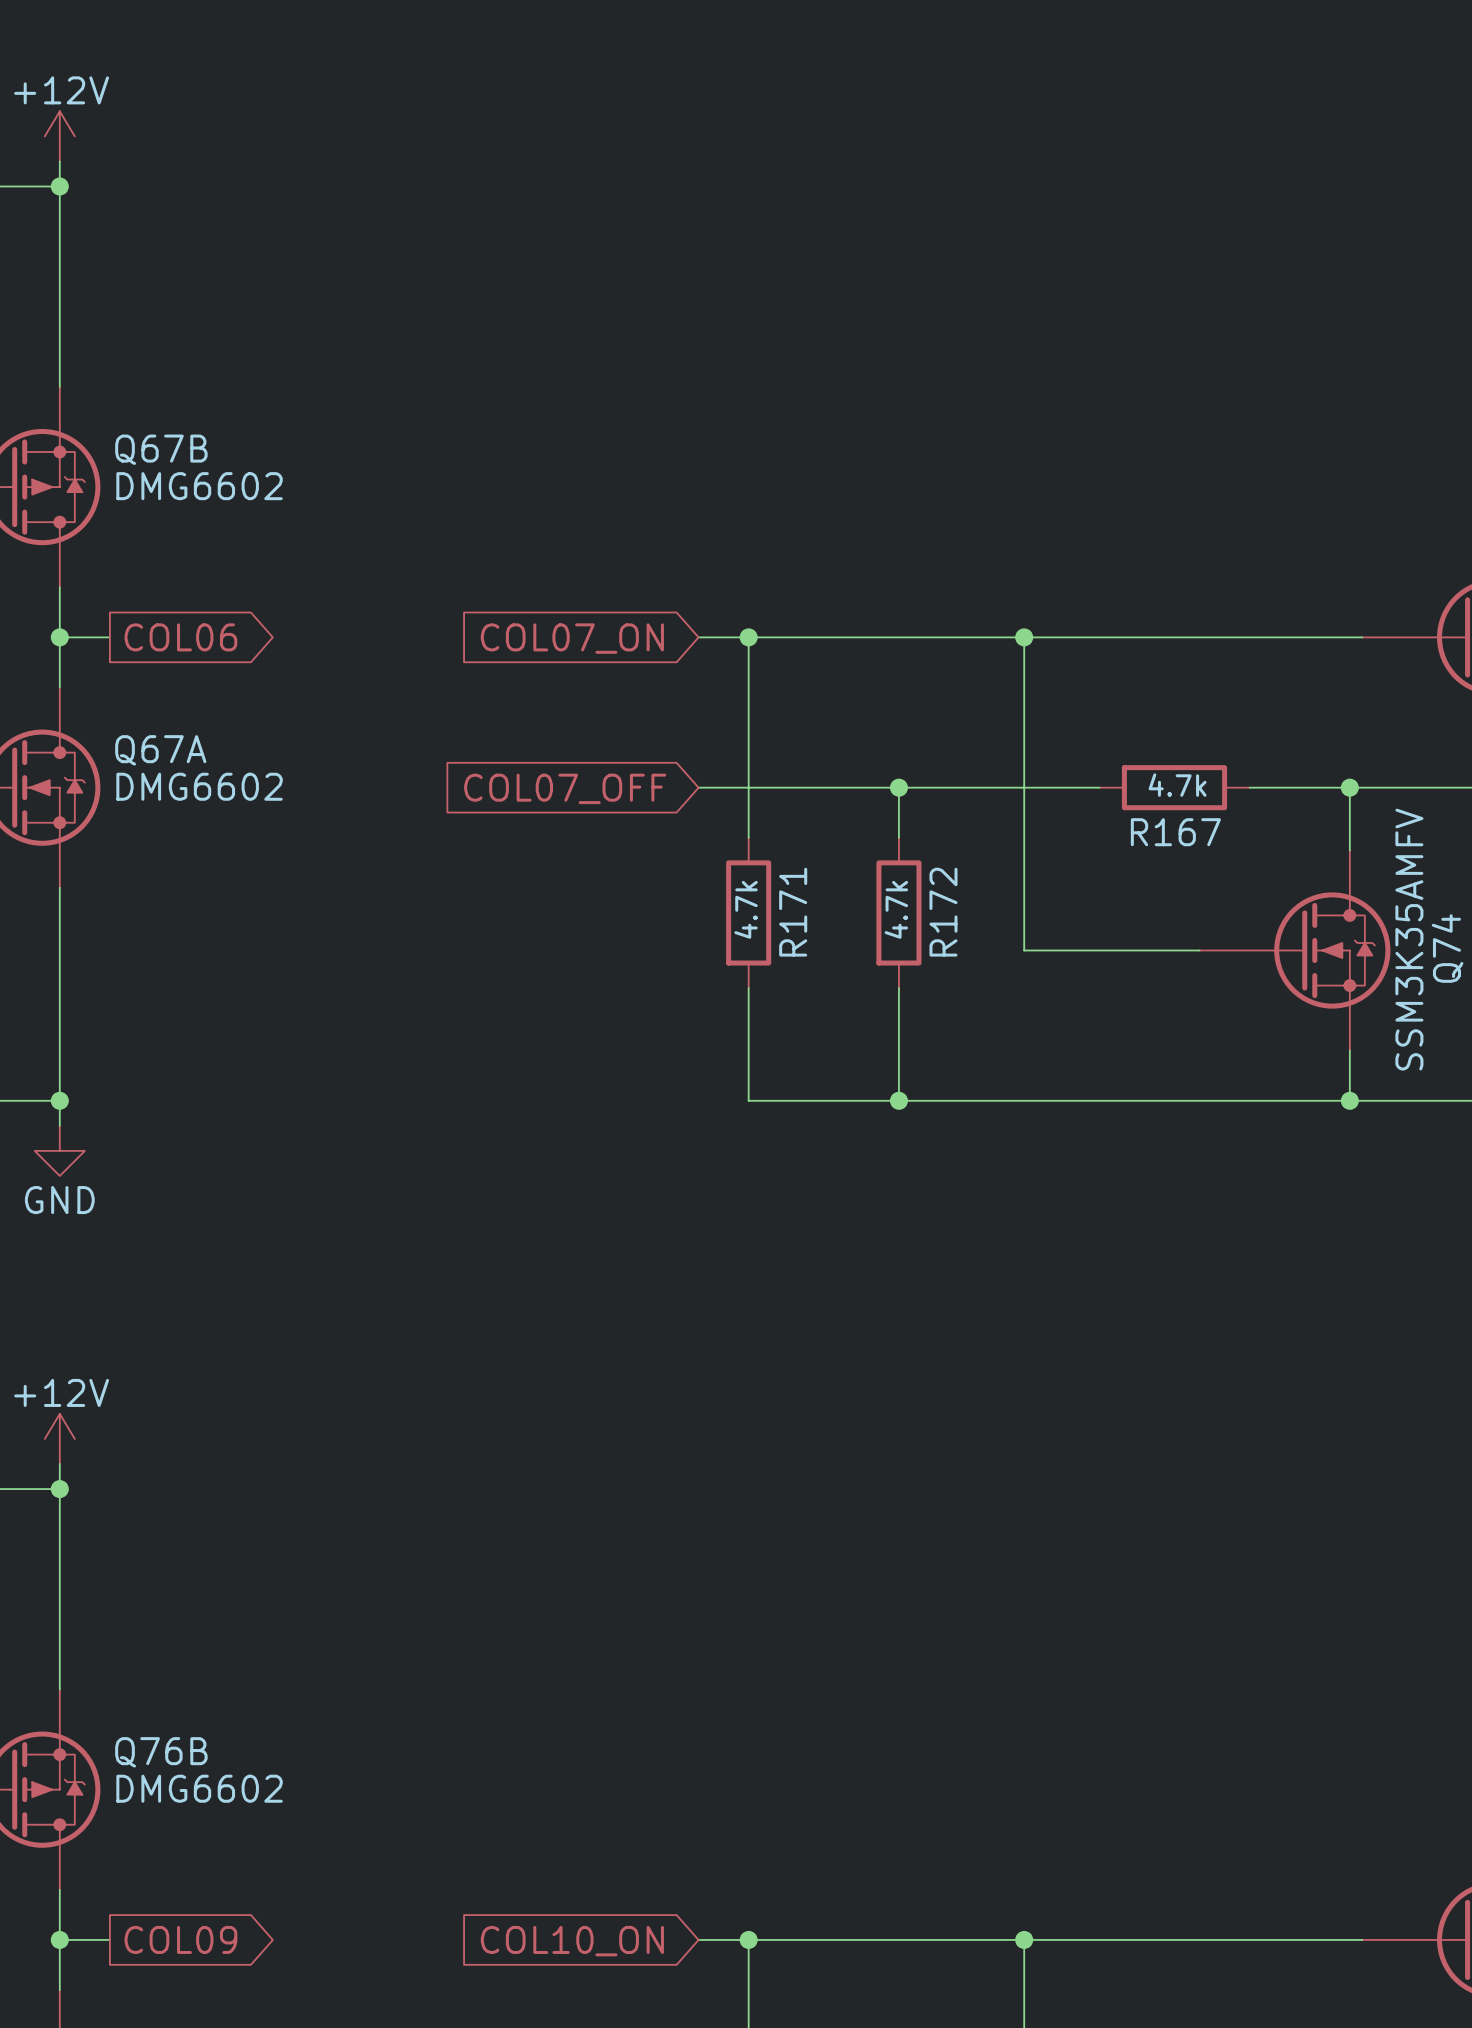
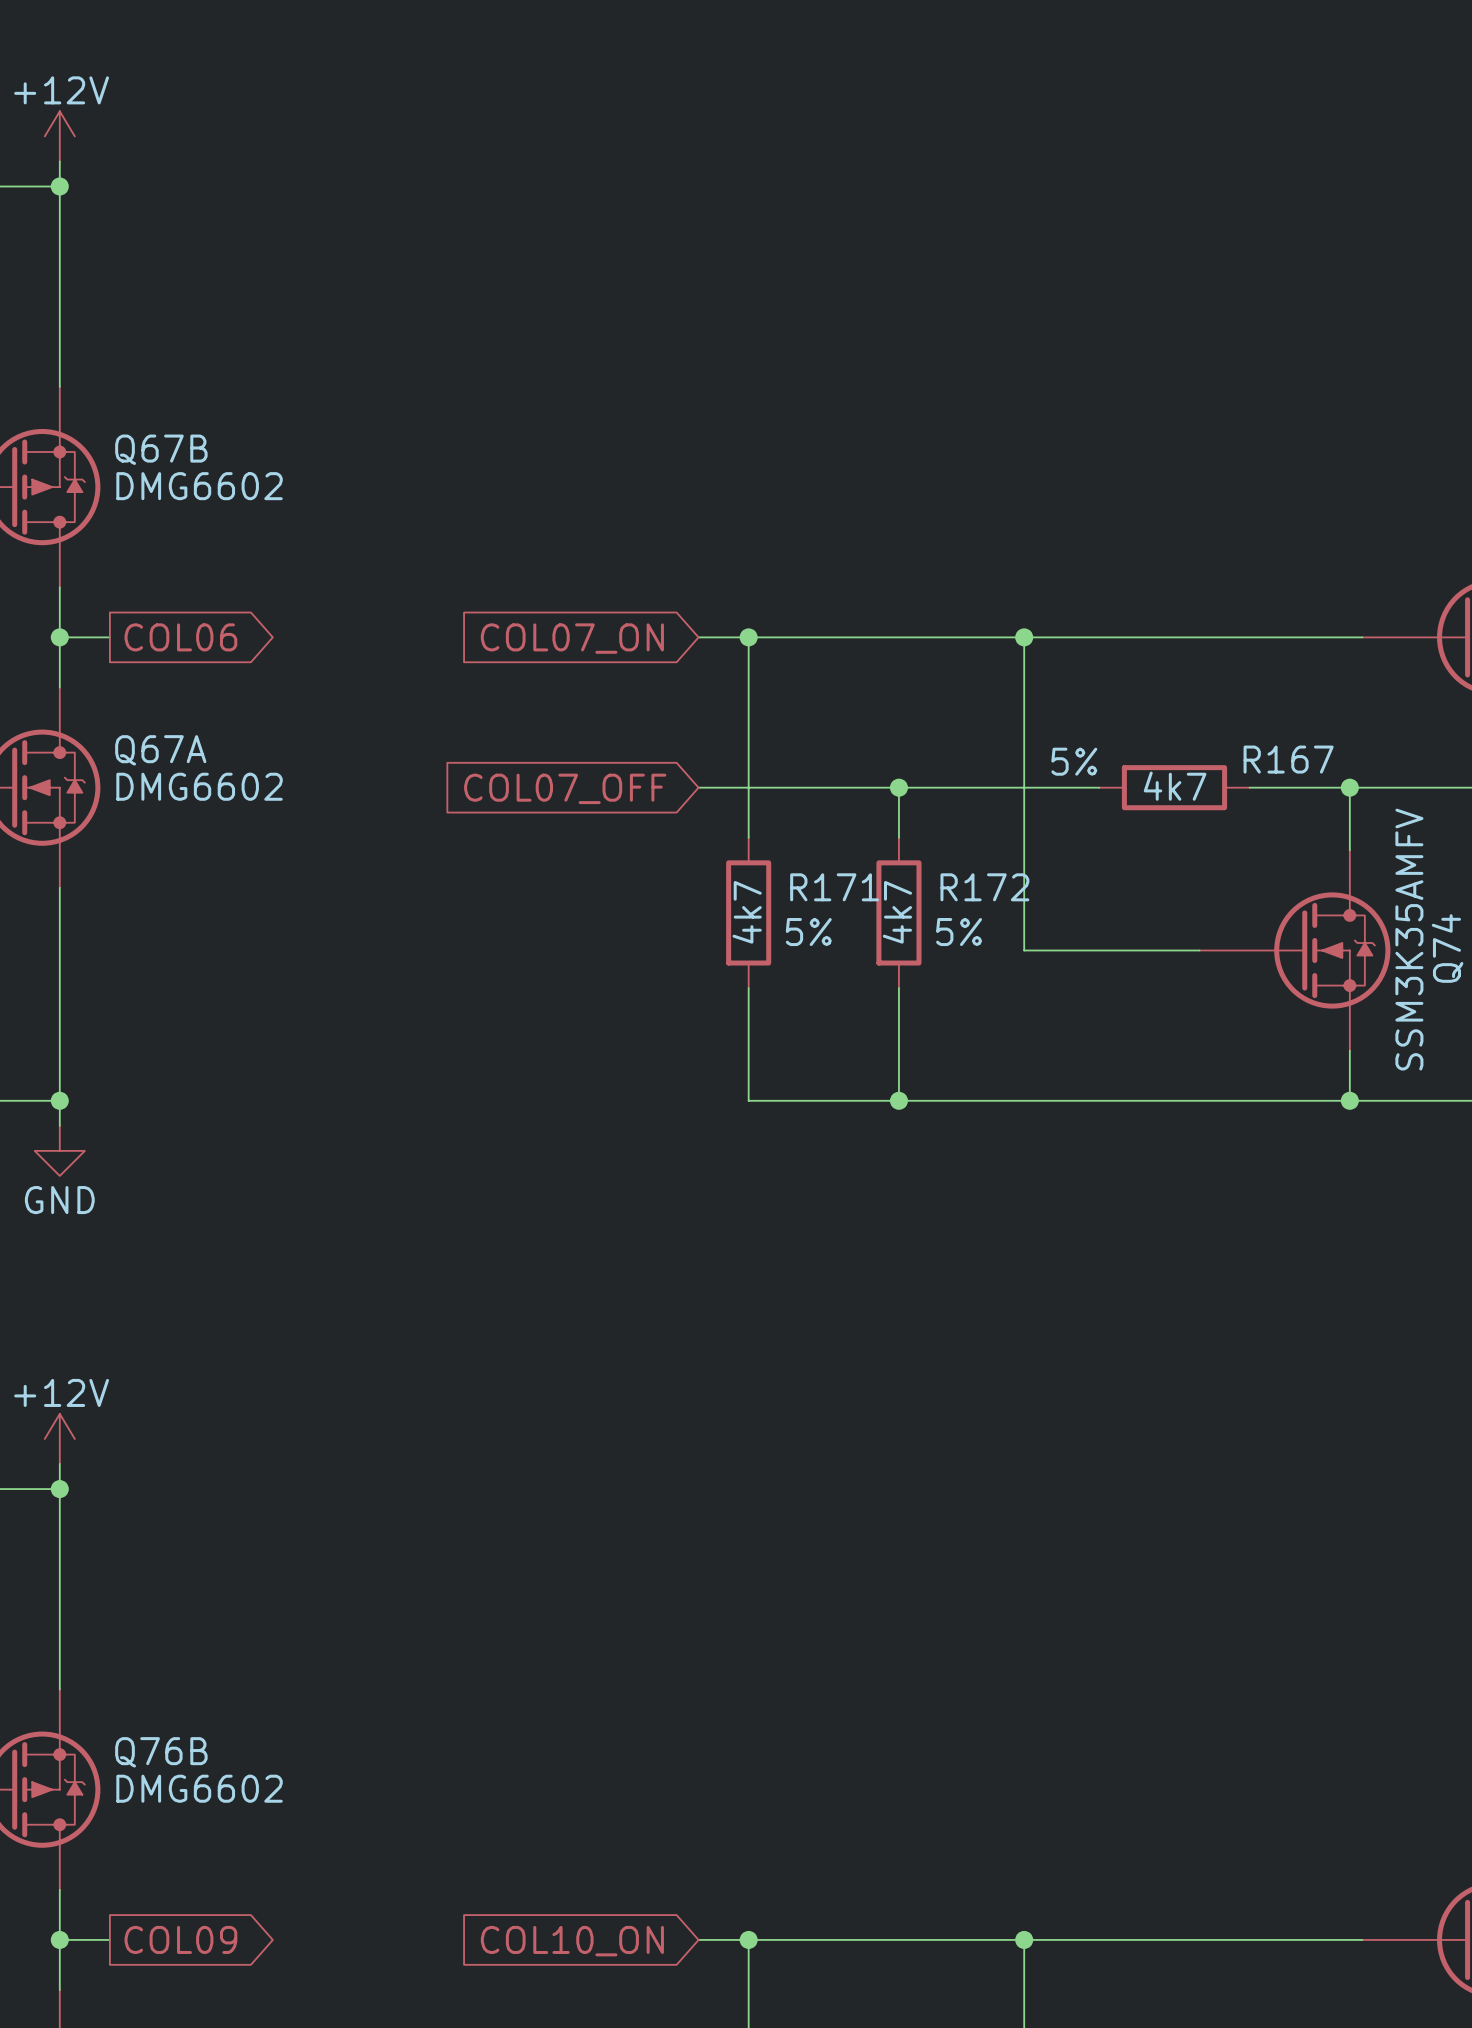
R167 text: none -> 5% (1074, 761)
R167 text: 4.7k (1177, 785) -> none
R167 text: none -> 4k7 (1175, 786)
R167 name position: R167 (1175, 832) -> R167 (1288, 759)
R171 text: 4.7k (746, 909) -> none
R172 text: 4.7k (896, 909) -> none
R171 text: none -> 4k7 (747, 912)
R171 name rotation: 0° (793, 912) -> 90° clockwise (834, 887)
R172 text: none -> 4k7 (897, 912)
R172 name rotation: 0° (943, 912) -> 90° clockwise (984, 887)
R171 text: none -> 5% (808, 932)
R172 text: none -> 5% (959, 932)

